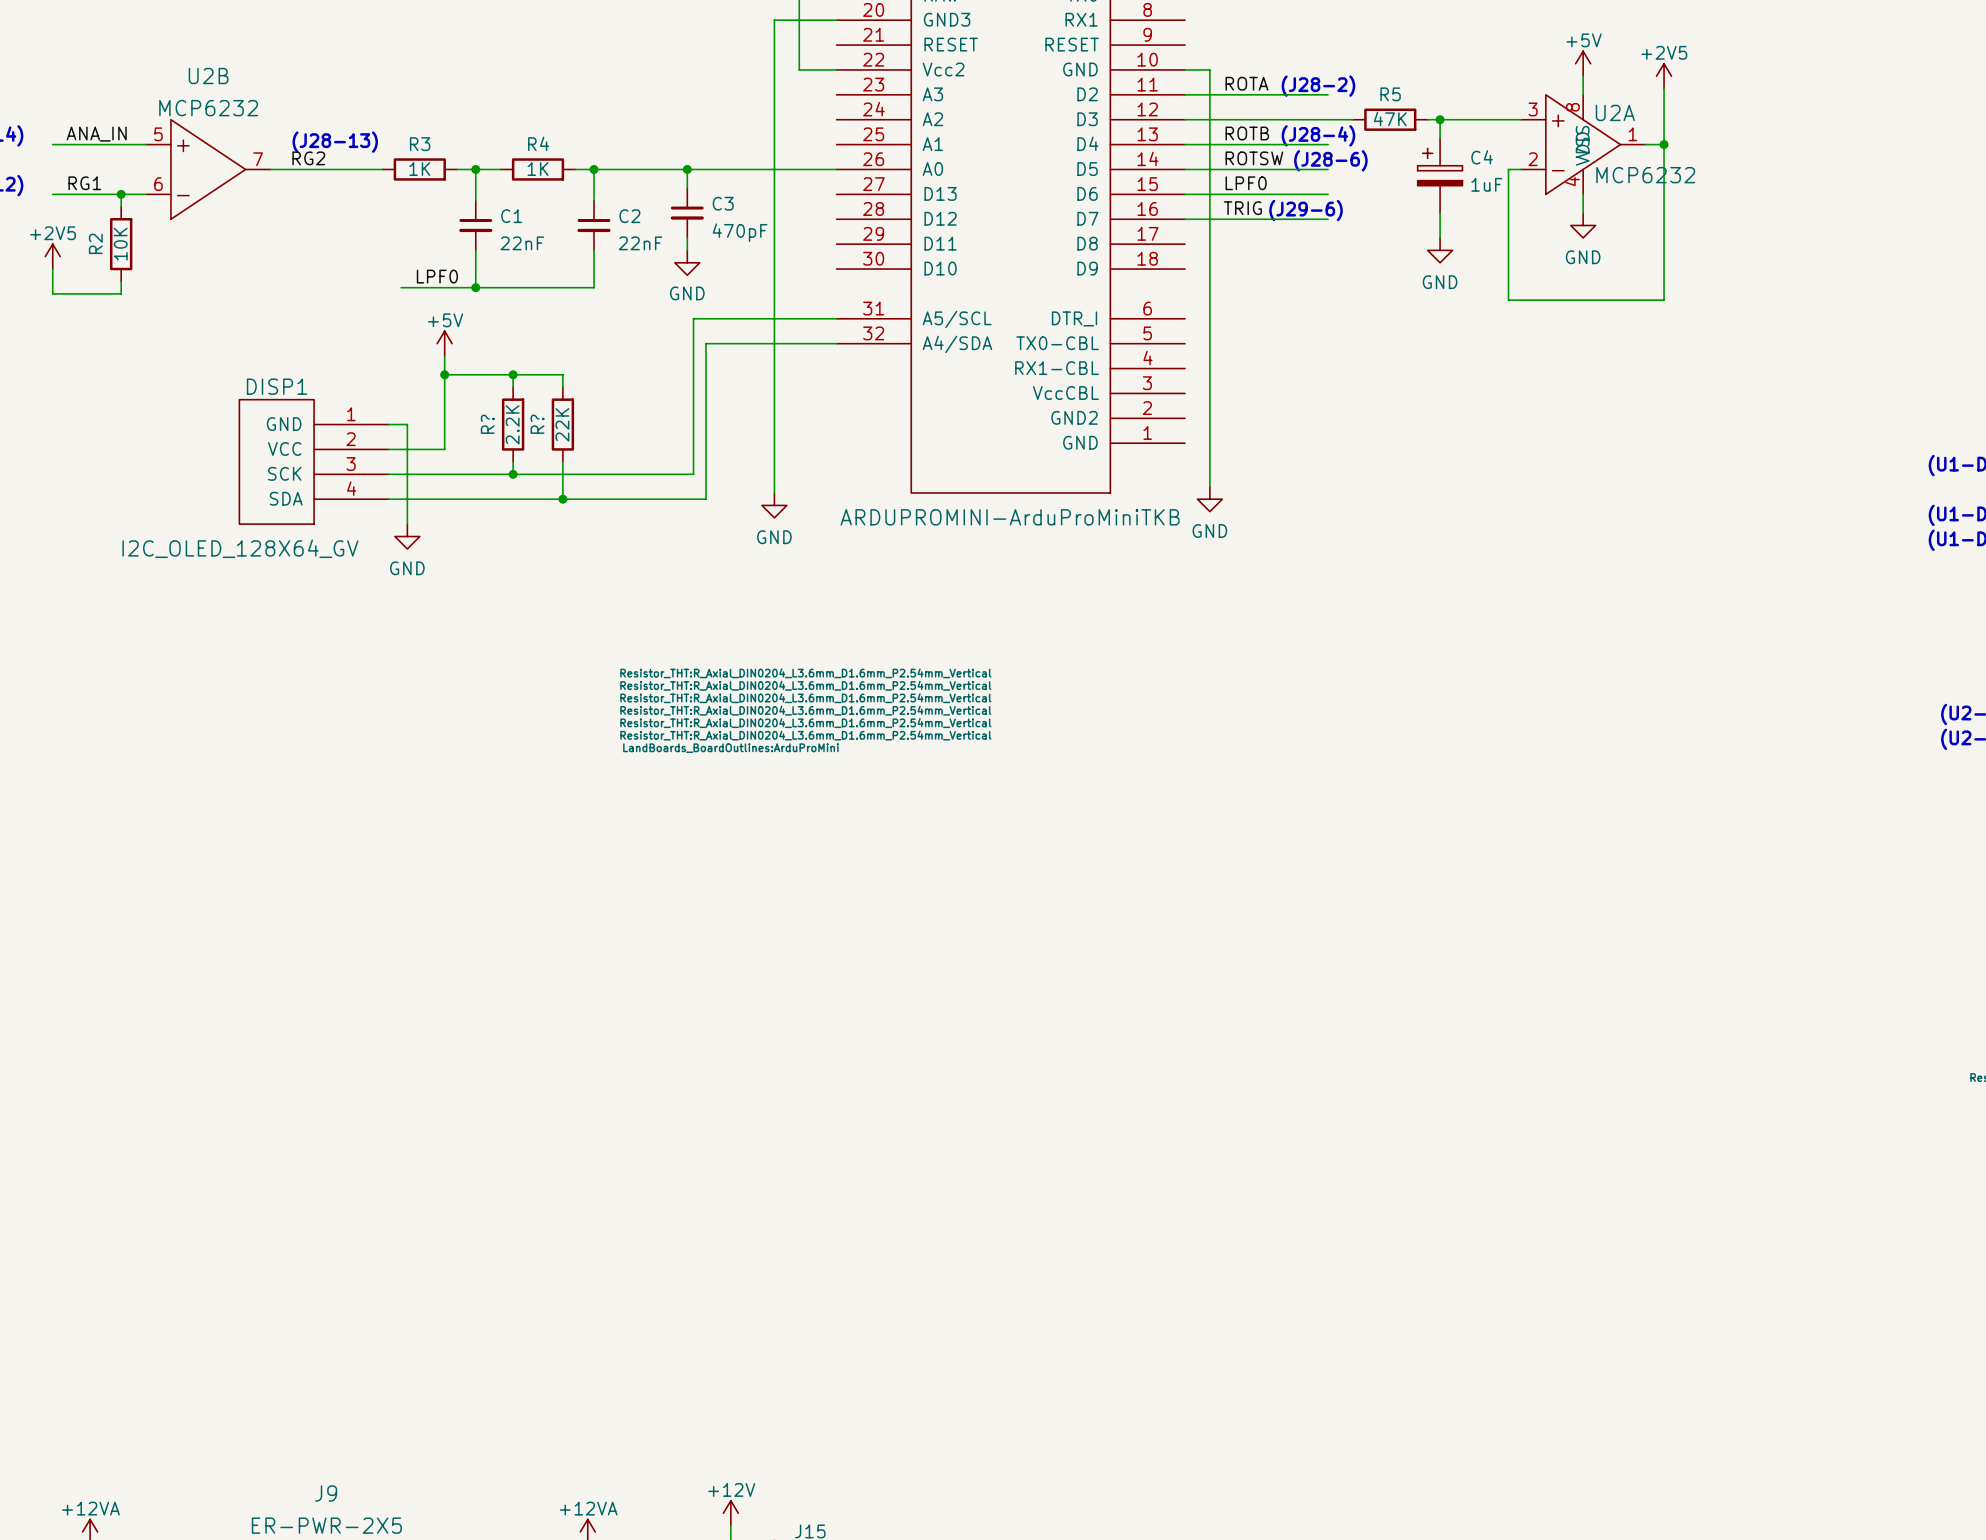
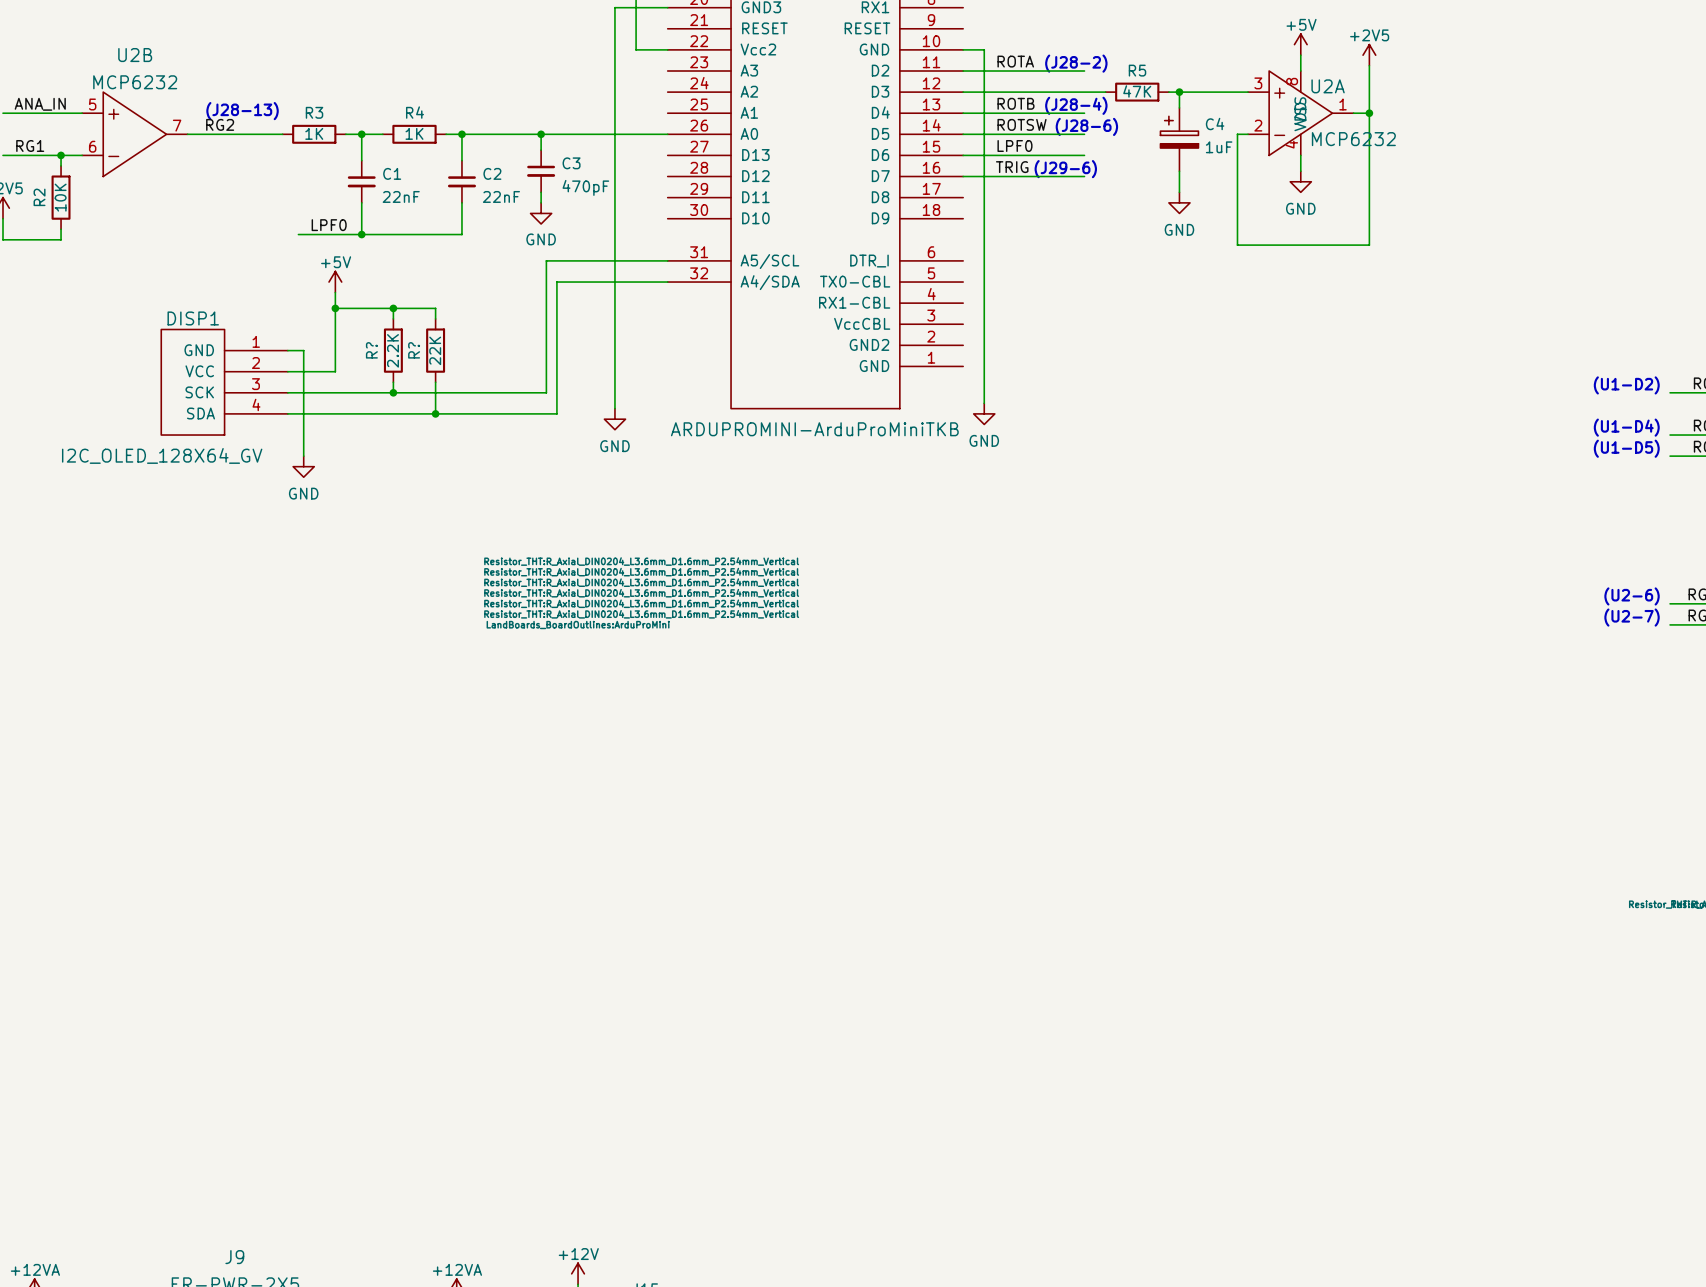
power symbol position: GND (407, 536) -> GND (303, 466)

